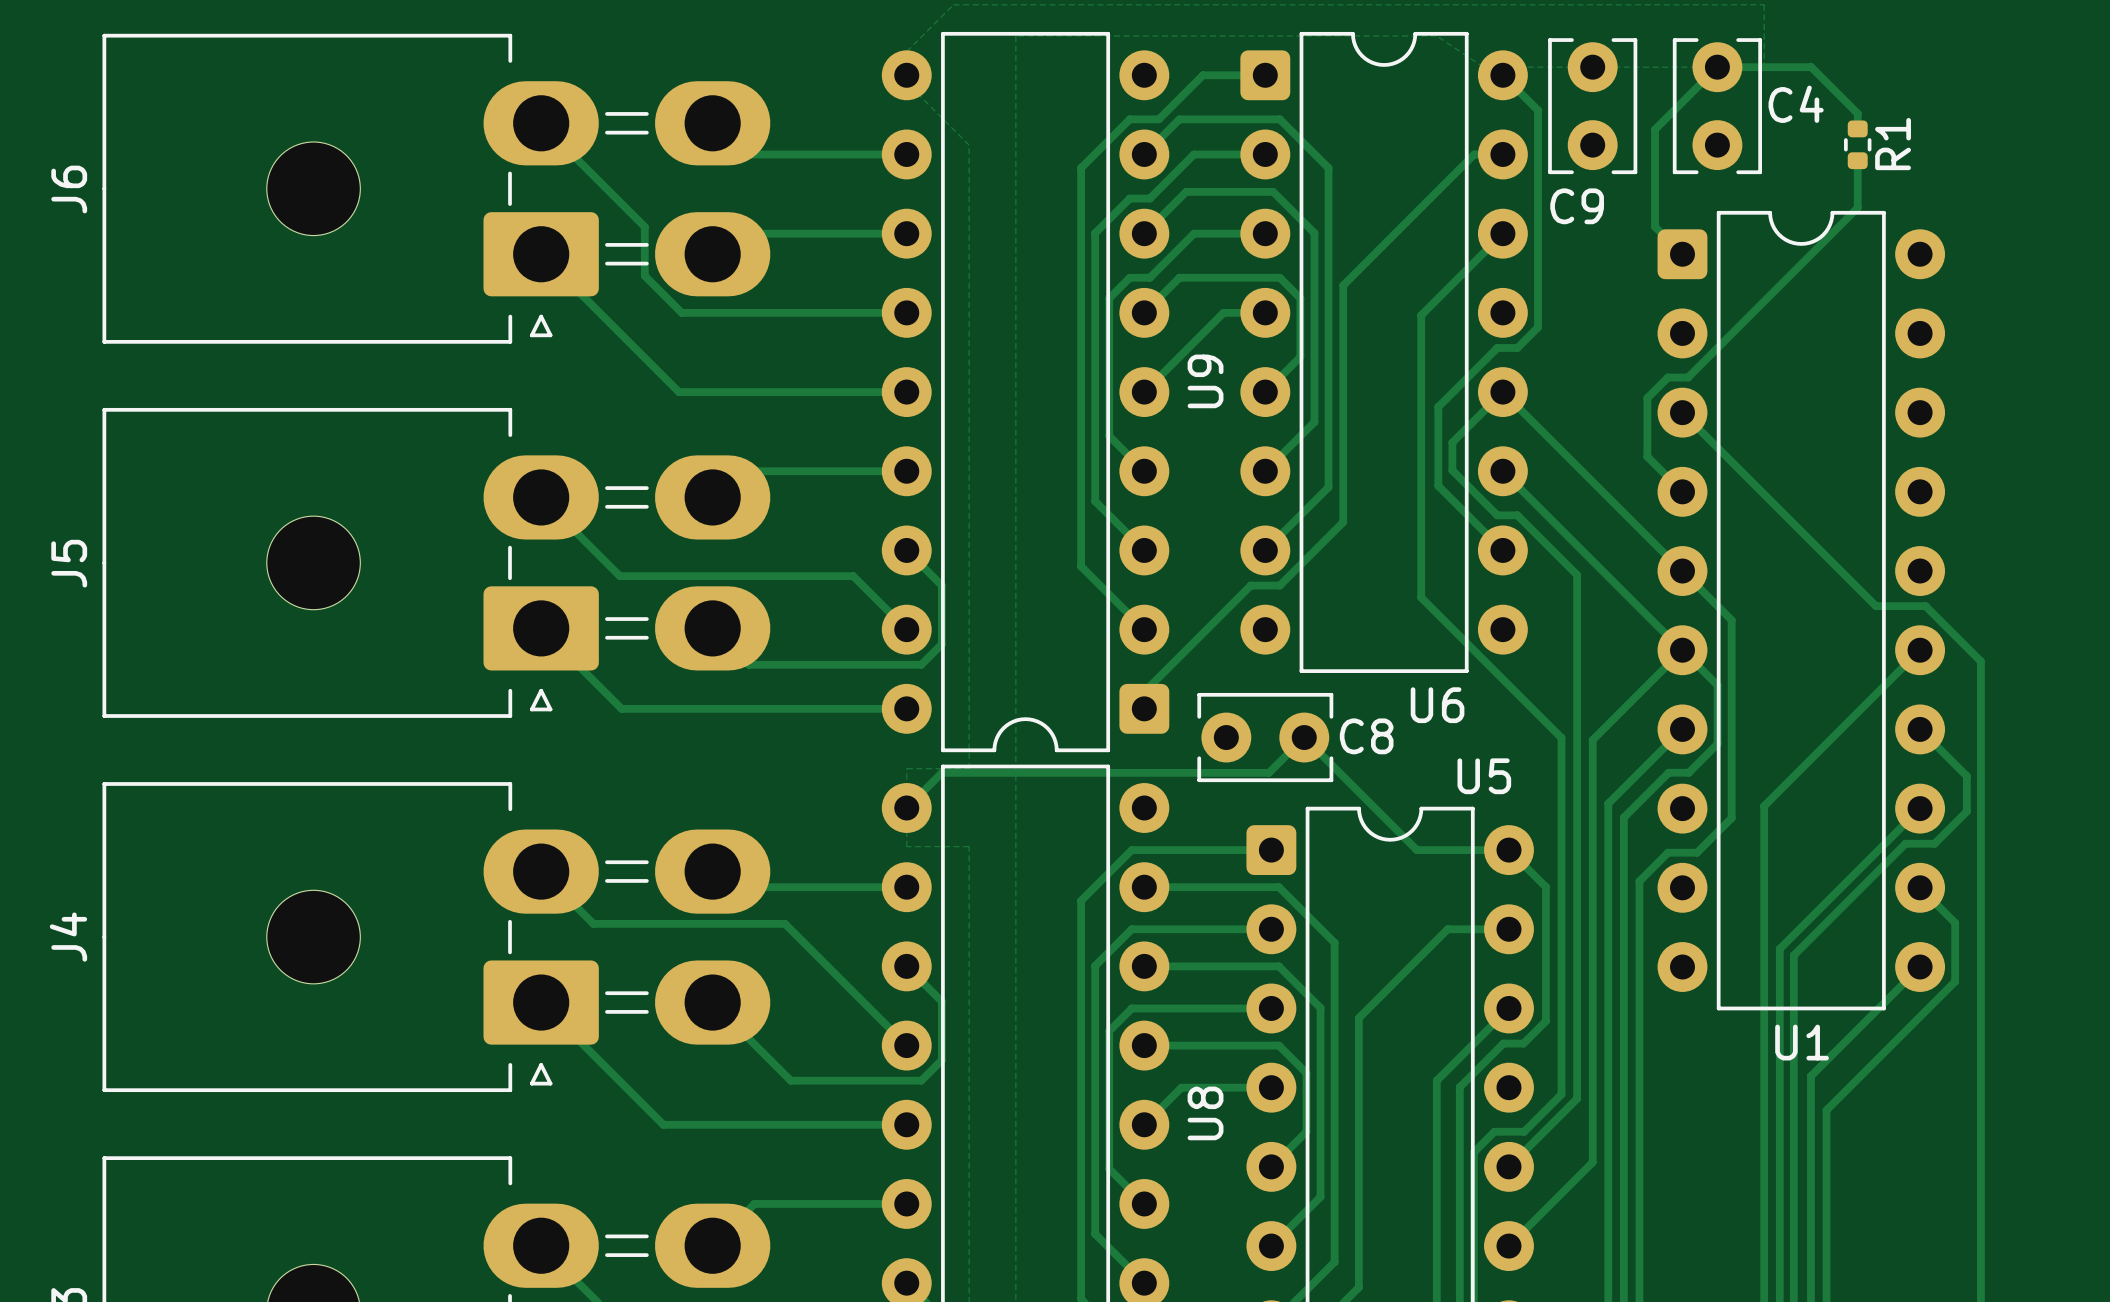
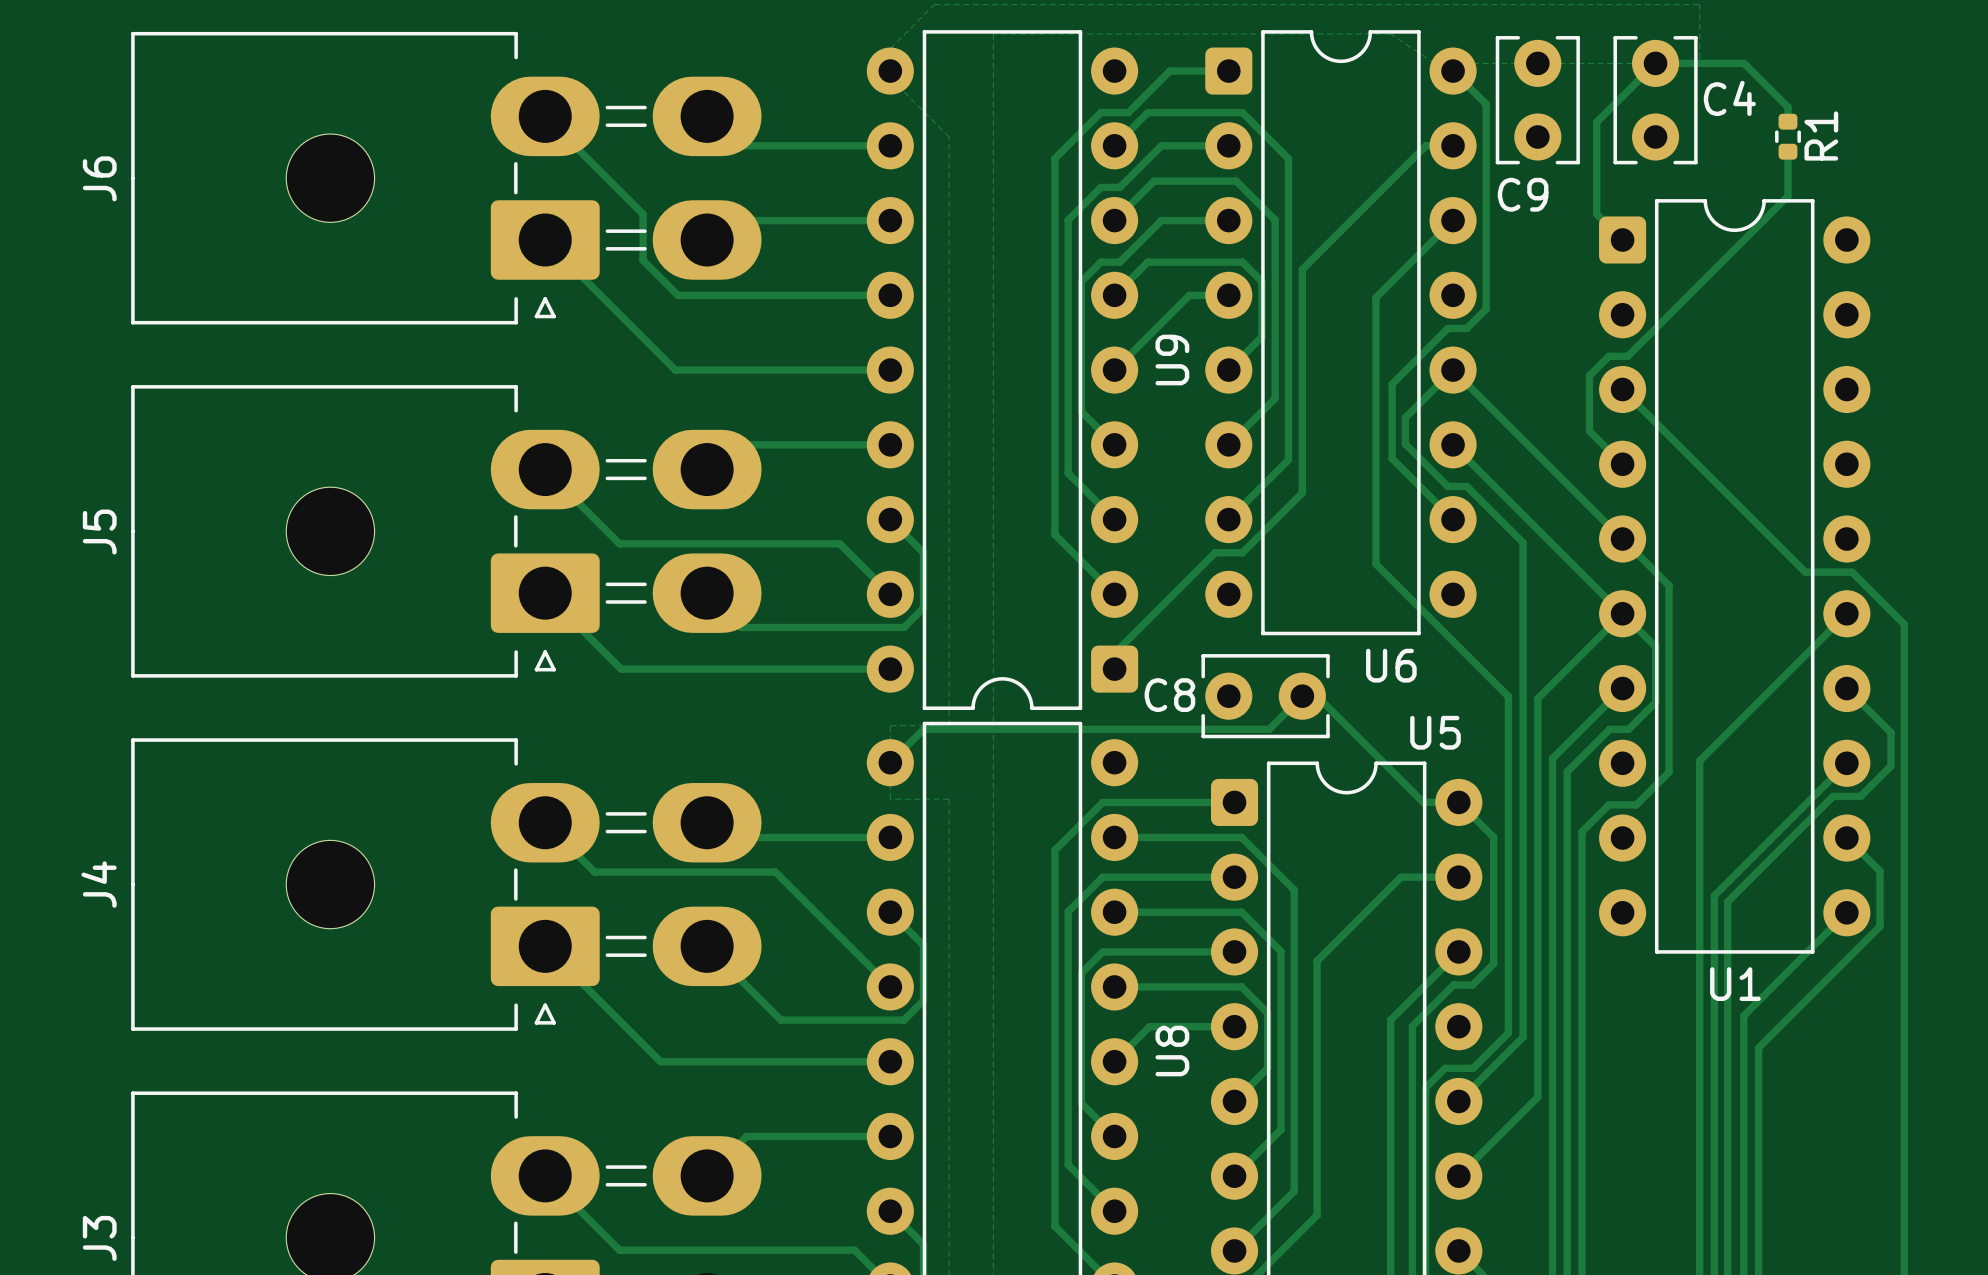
C8 name position: C8 (1366, 736) -> C8 (1169, 695)
C8 position: (1265, 737) -> (1265, 696)
track: (1268, 772) (1304, 737) (1416, 850) (1471, 850) -> (1232, 729) (1269, 729) (1302, 696) (1317, 696) (1423, 802)

